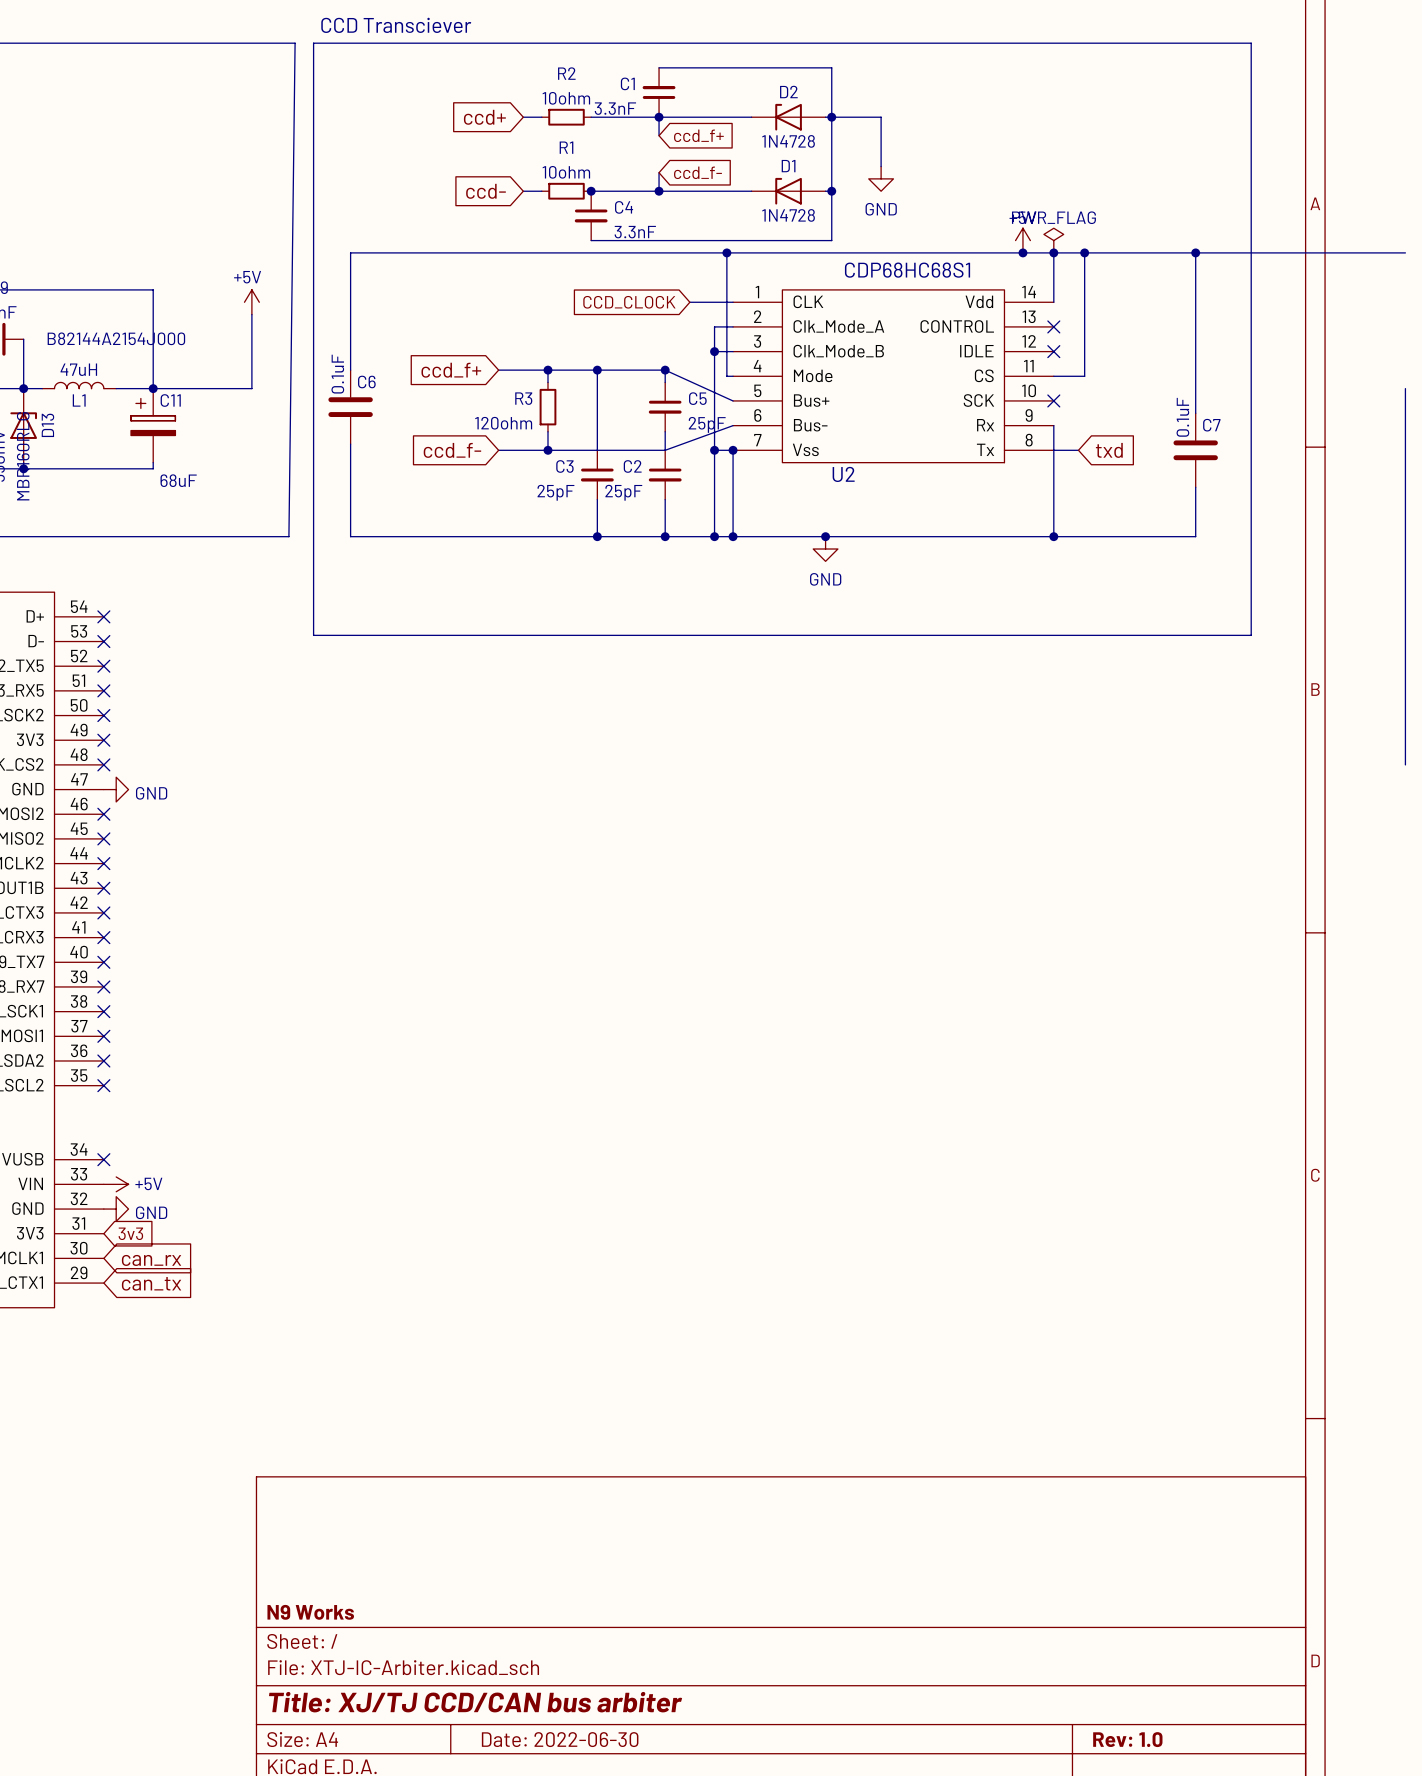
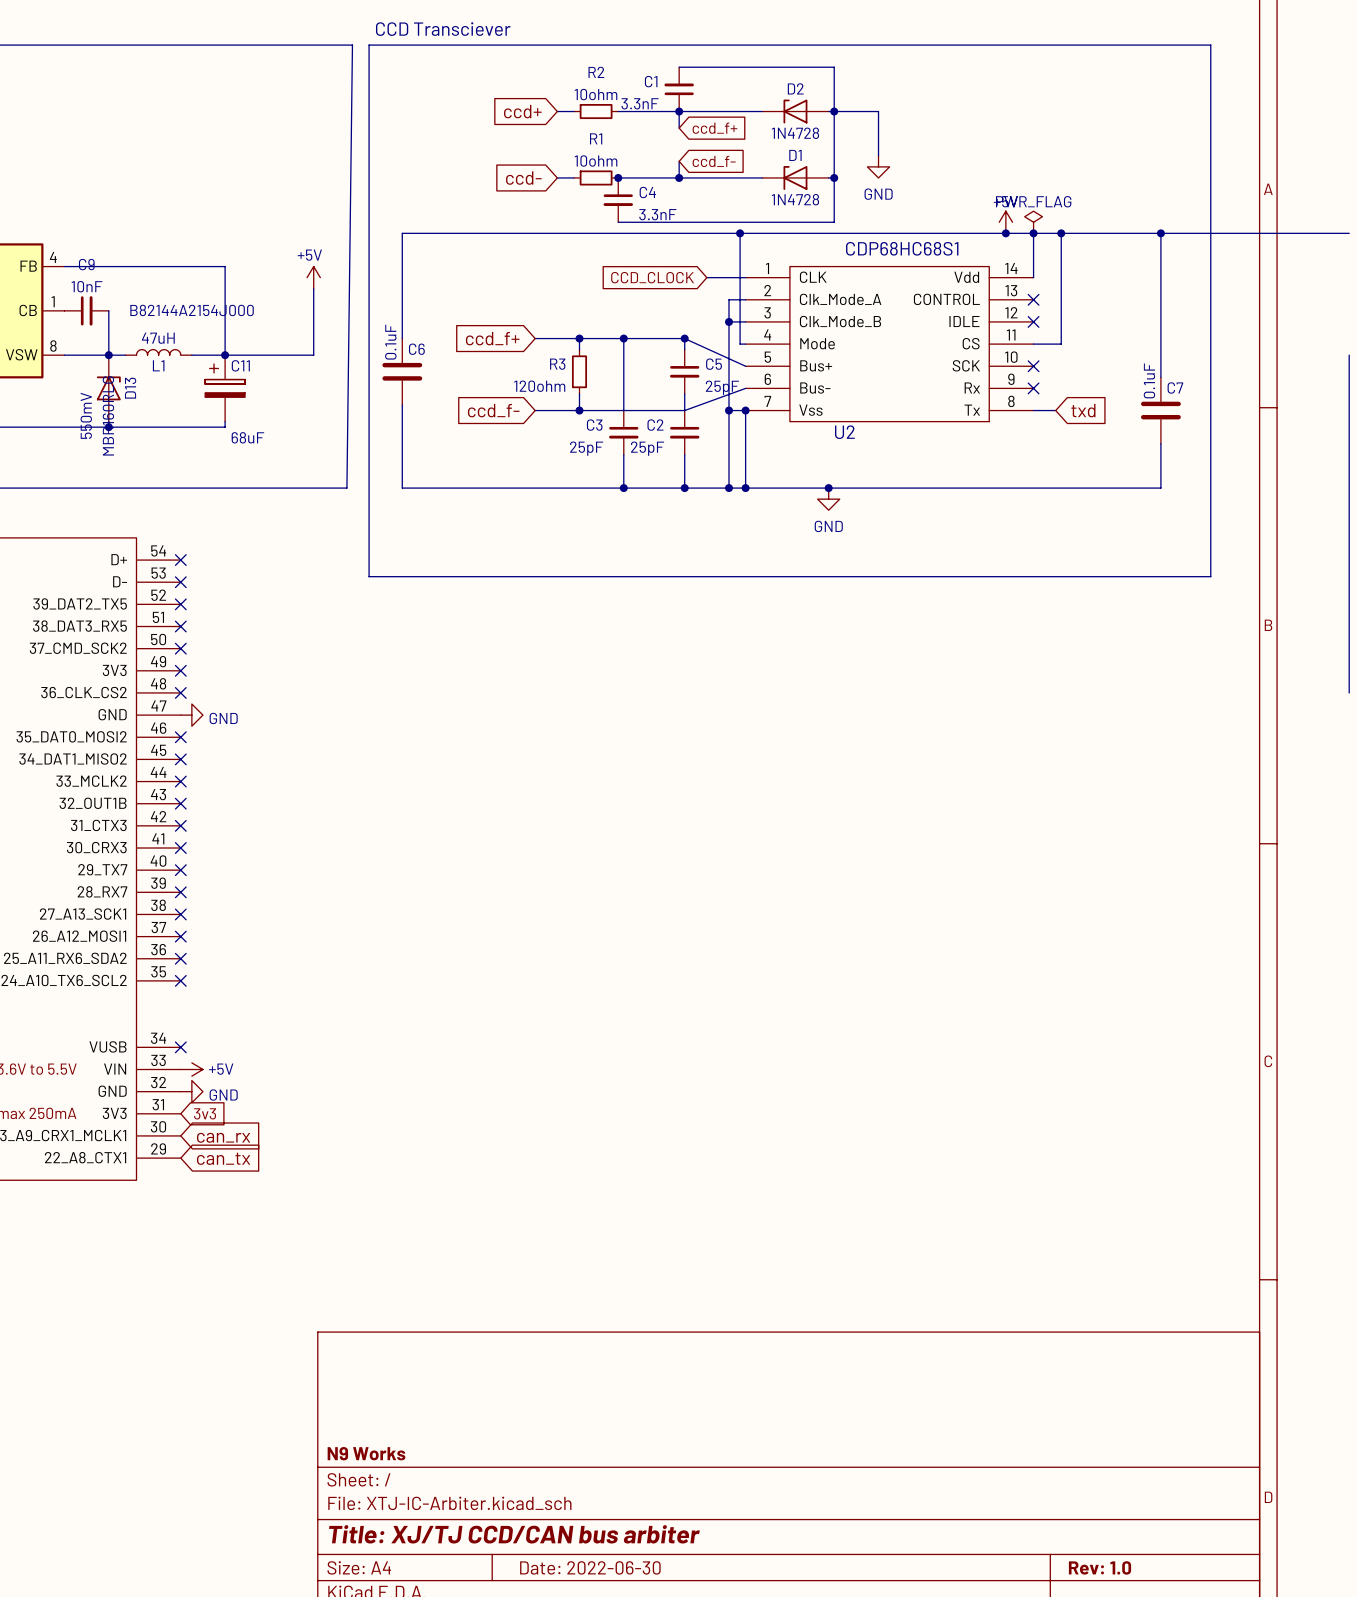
wire: (1053, 425) (1053, 536) -> none
no-connect mark: none -> (1033, 388)
junction: (1053, 536) -> none

